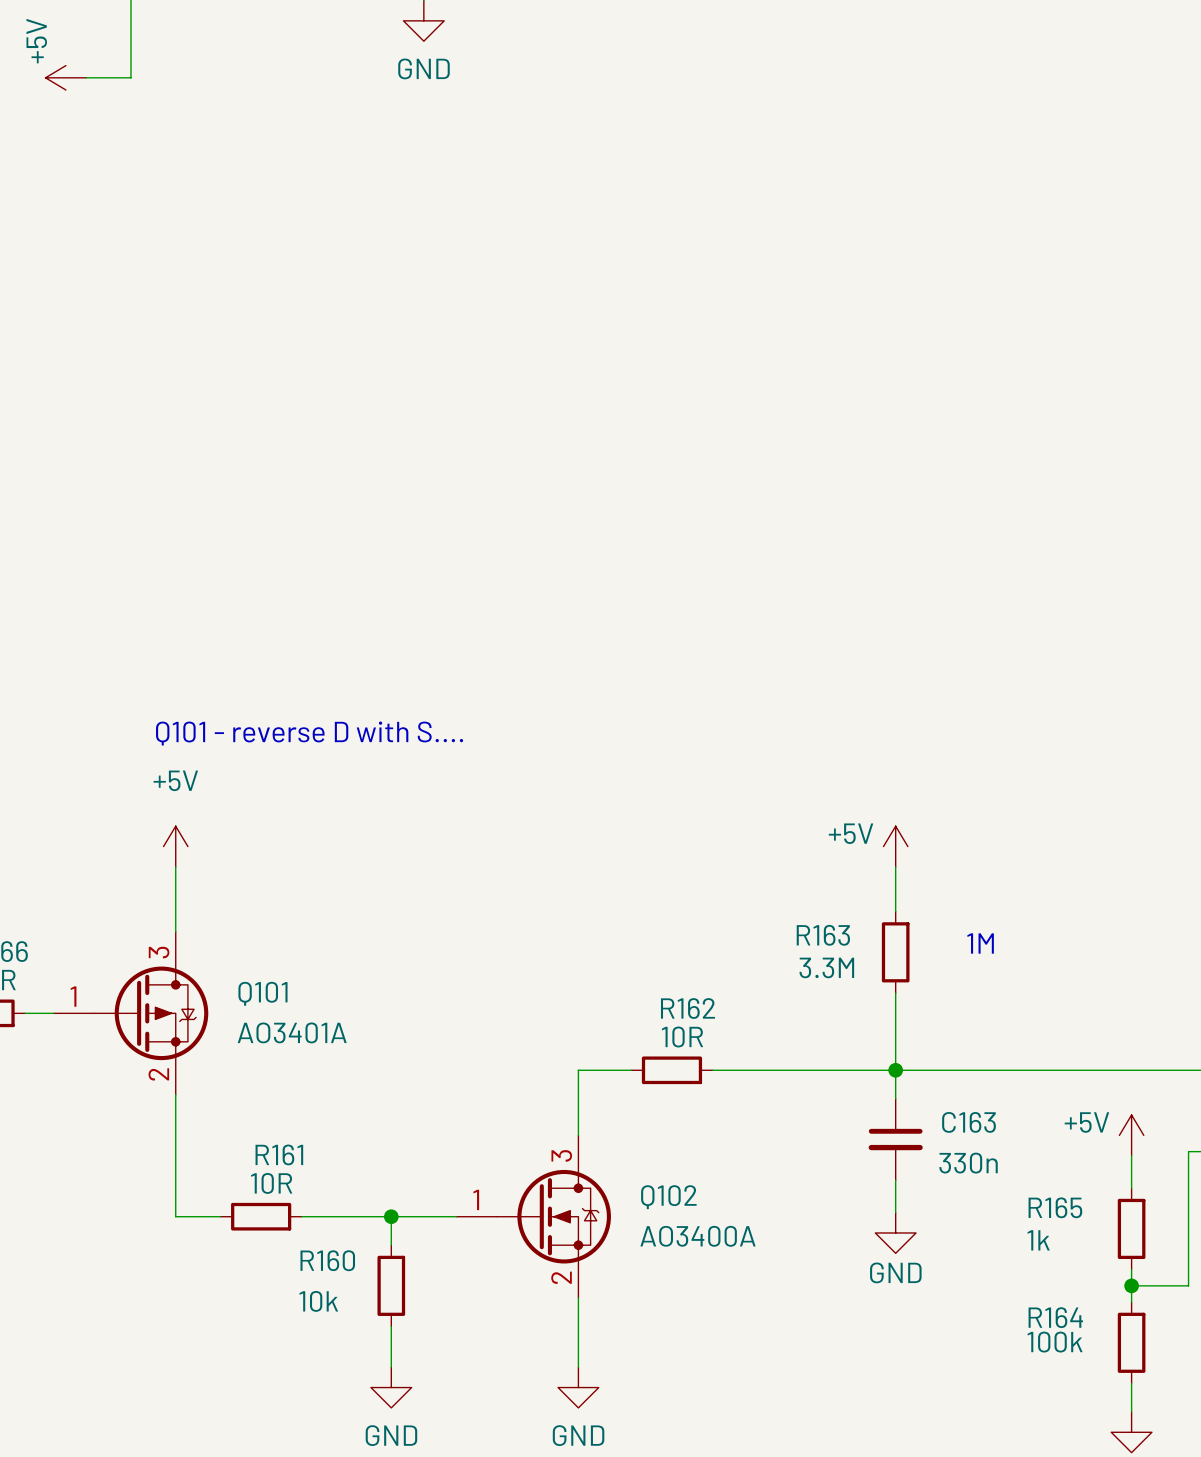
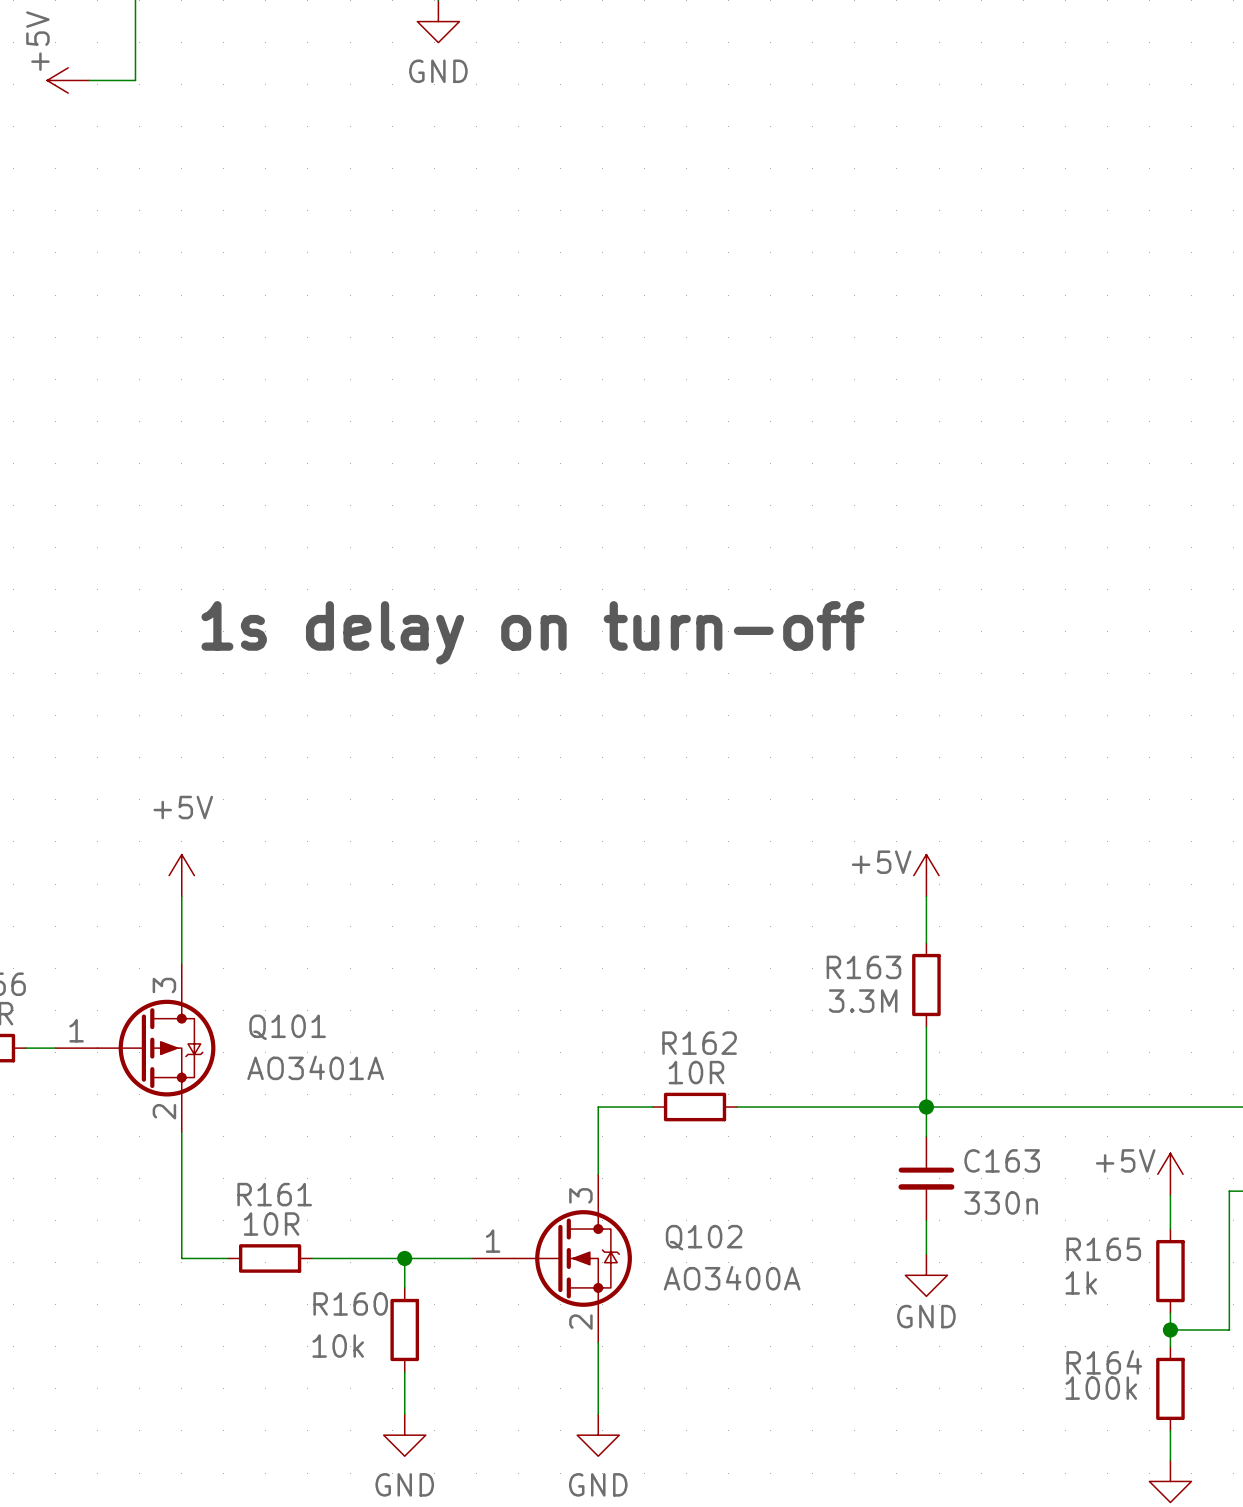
text: none -> 1s delay on turn-off (532, 632)
text: Q101 - reverse D with S.... (309, 733) -> none
text: 1M (980, 943) -> none

